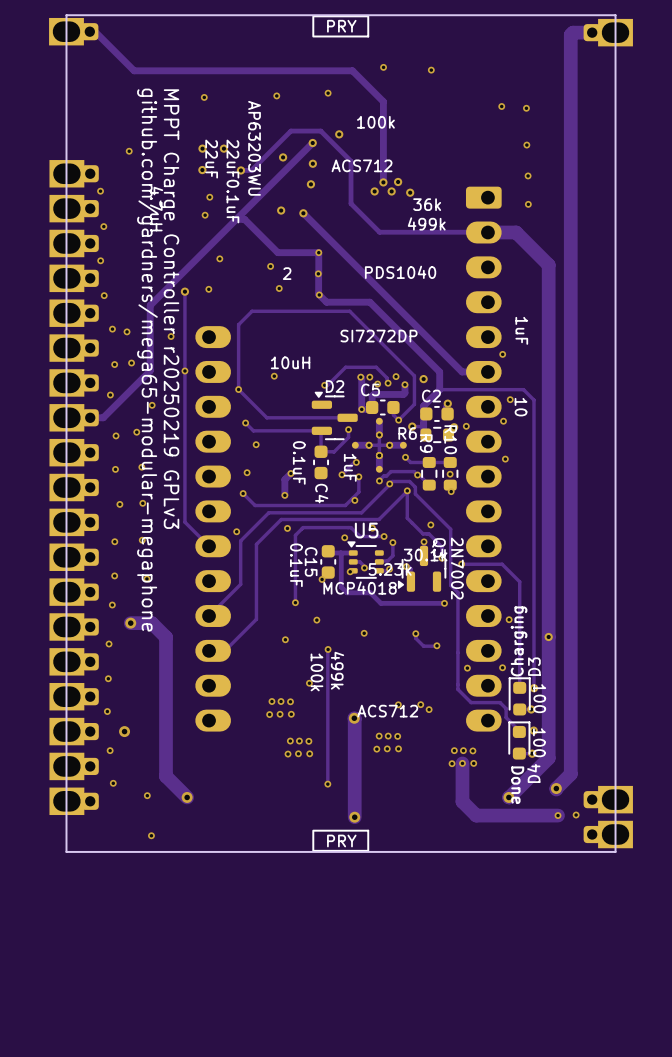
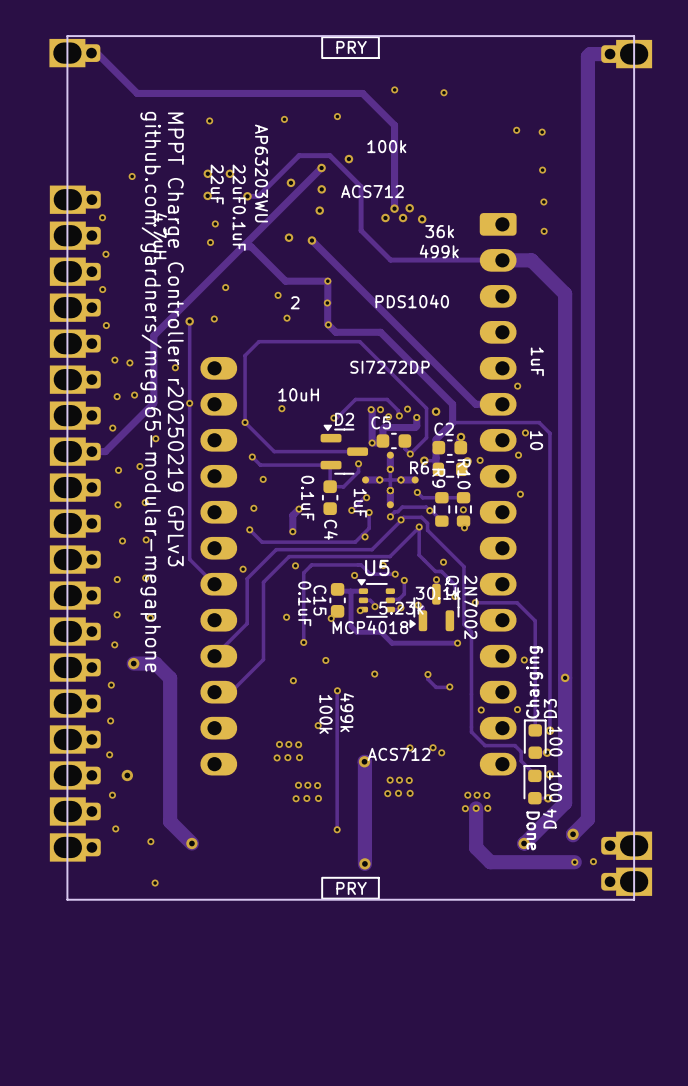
via: none -> (286, 617)

